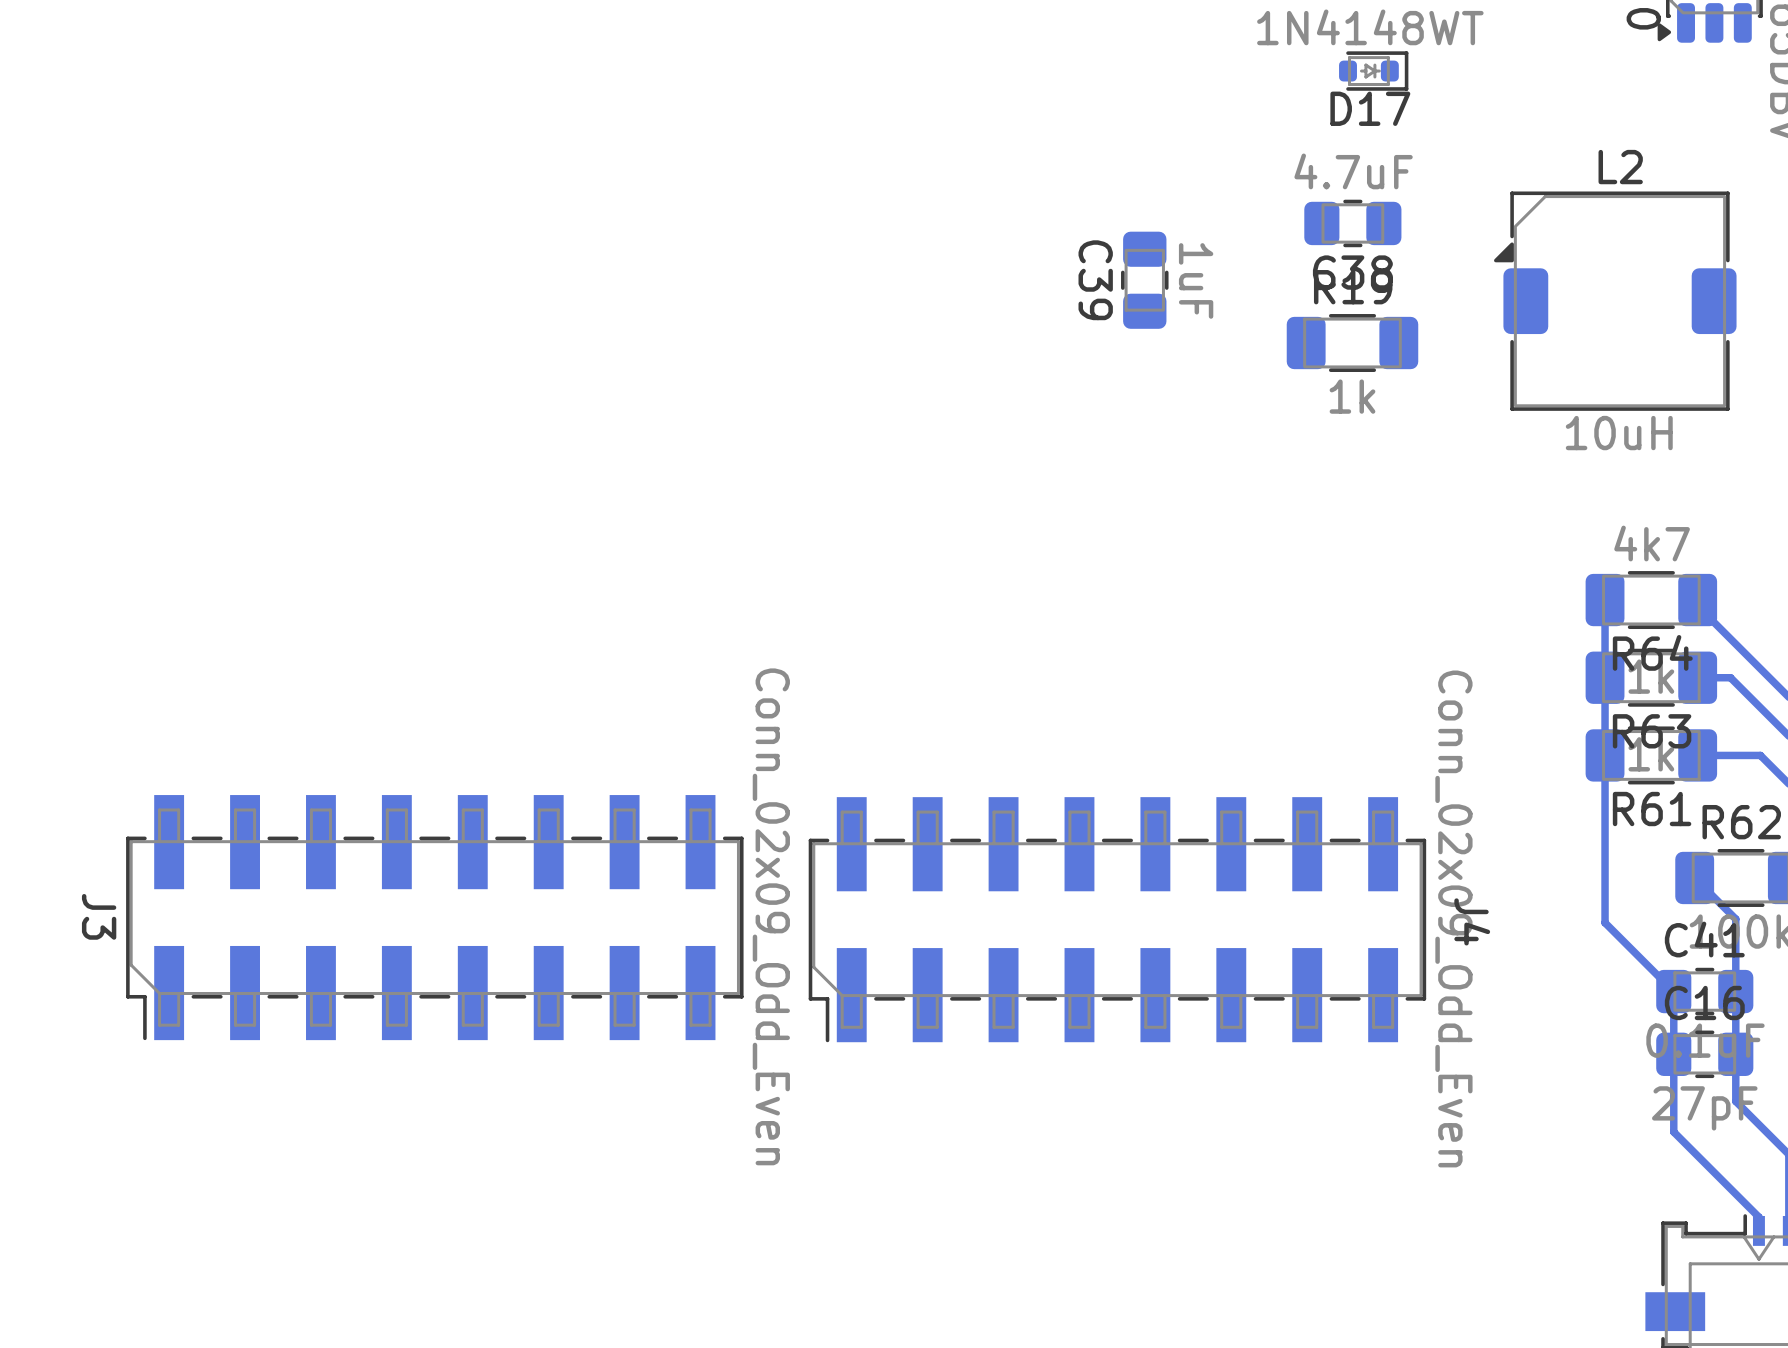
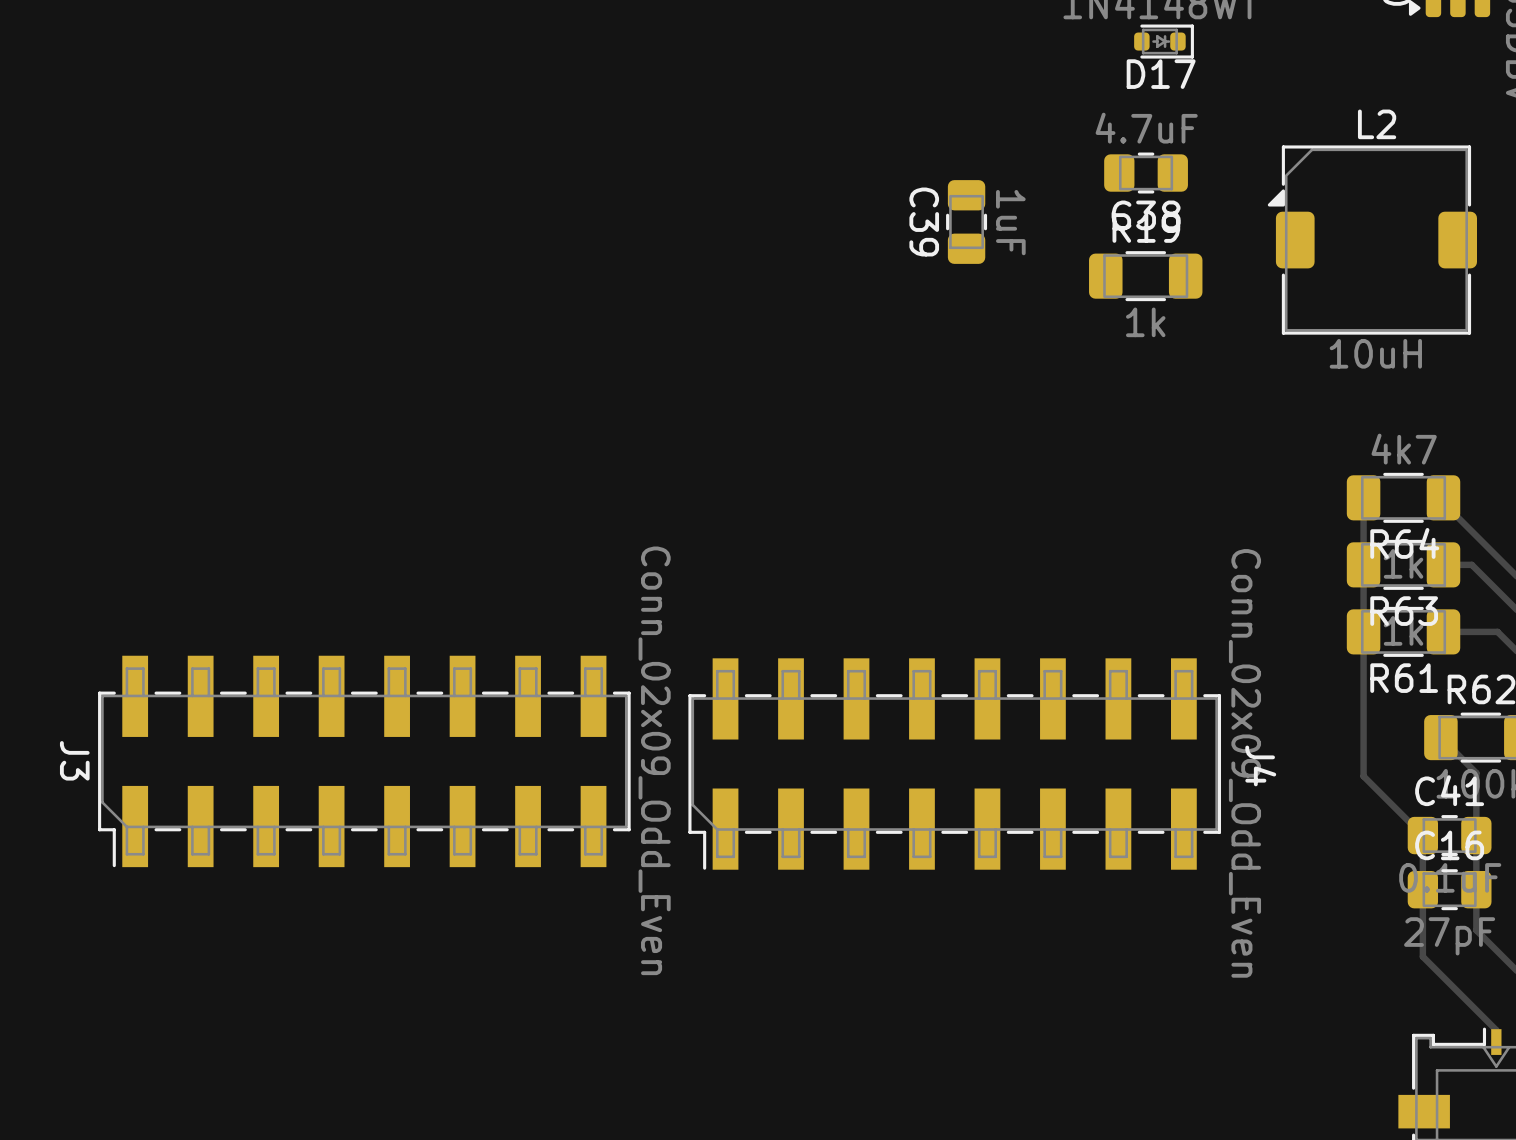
J3 position: (434, 917) -> (364, 761)
J4 position: (1117, 919) -> (954, 764)

